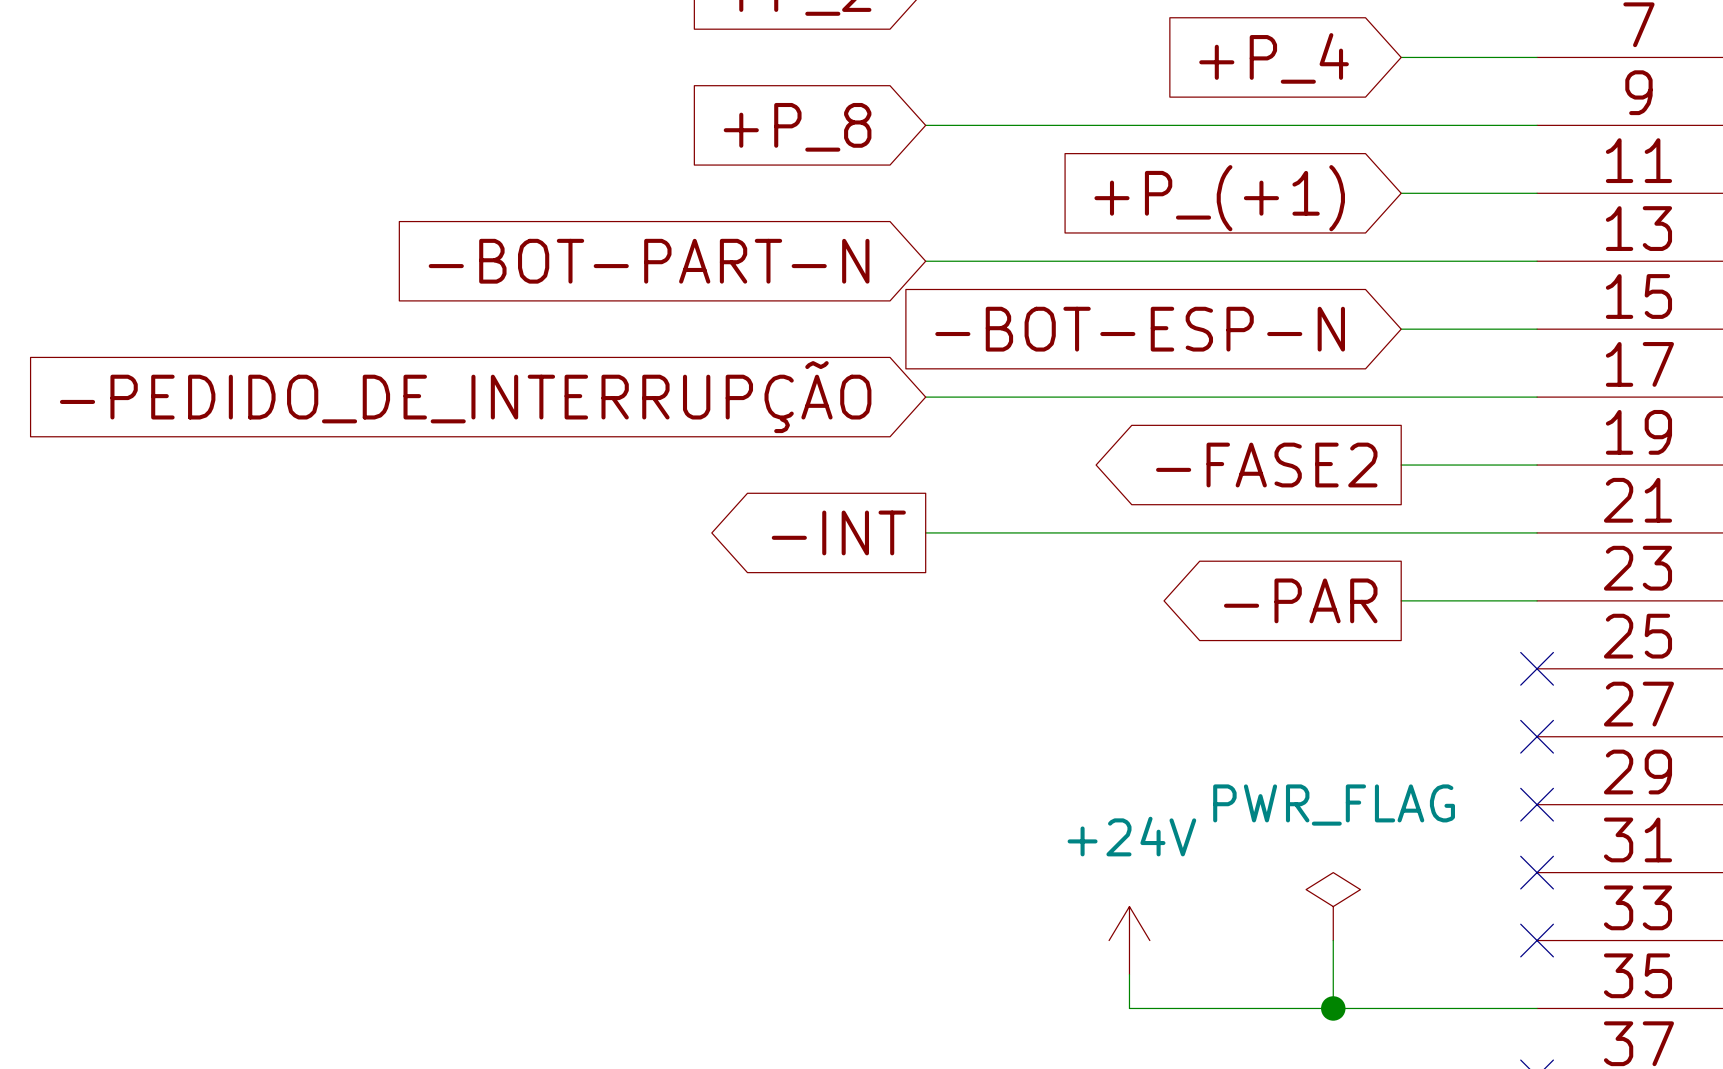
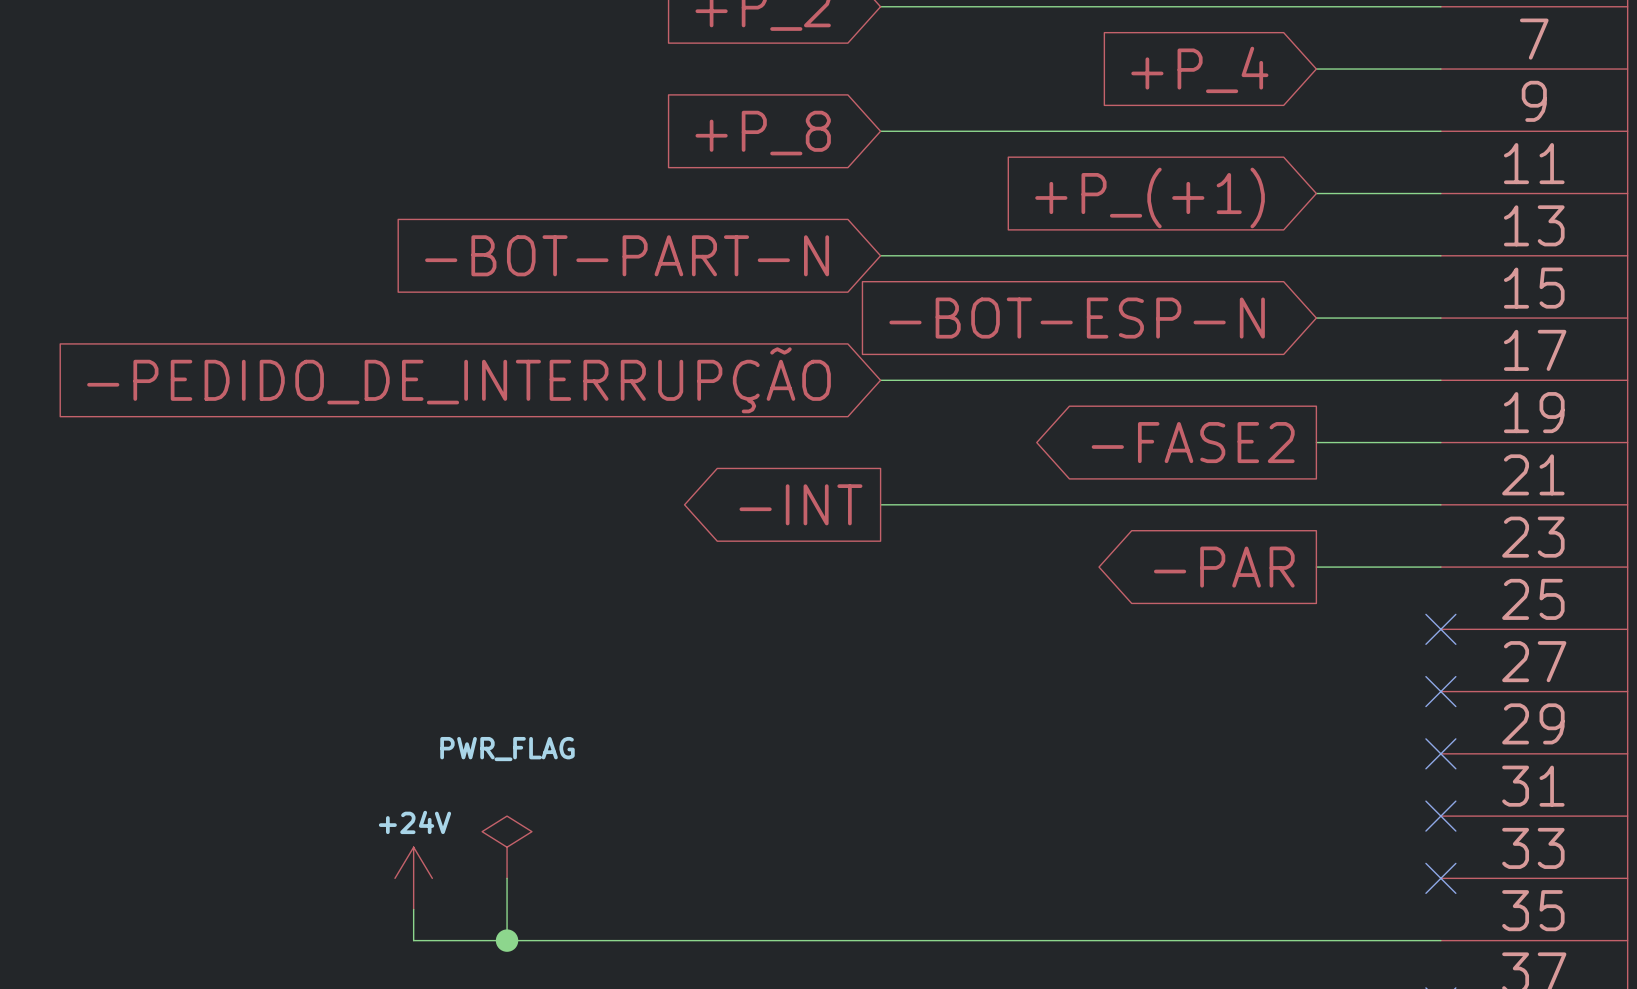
power symbol: none -> PWR_FLAG (507, 847)
power symbol: PWR_FLAG (1333, 906) -> none
power symbol: none -> +24V (413, 878)
wire: none -> (507, 878) (507, 940)
power symbol: +24V (1129, 940) -> none
wire: (1333, 940) (1333, 1008) -> none
wire: (1129, 974) (1129, 1008) -> (413, 909) (413, 940) (1067, 940)
junction: none -> (507, 940)
junction: (1333, 1008) -> none

